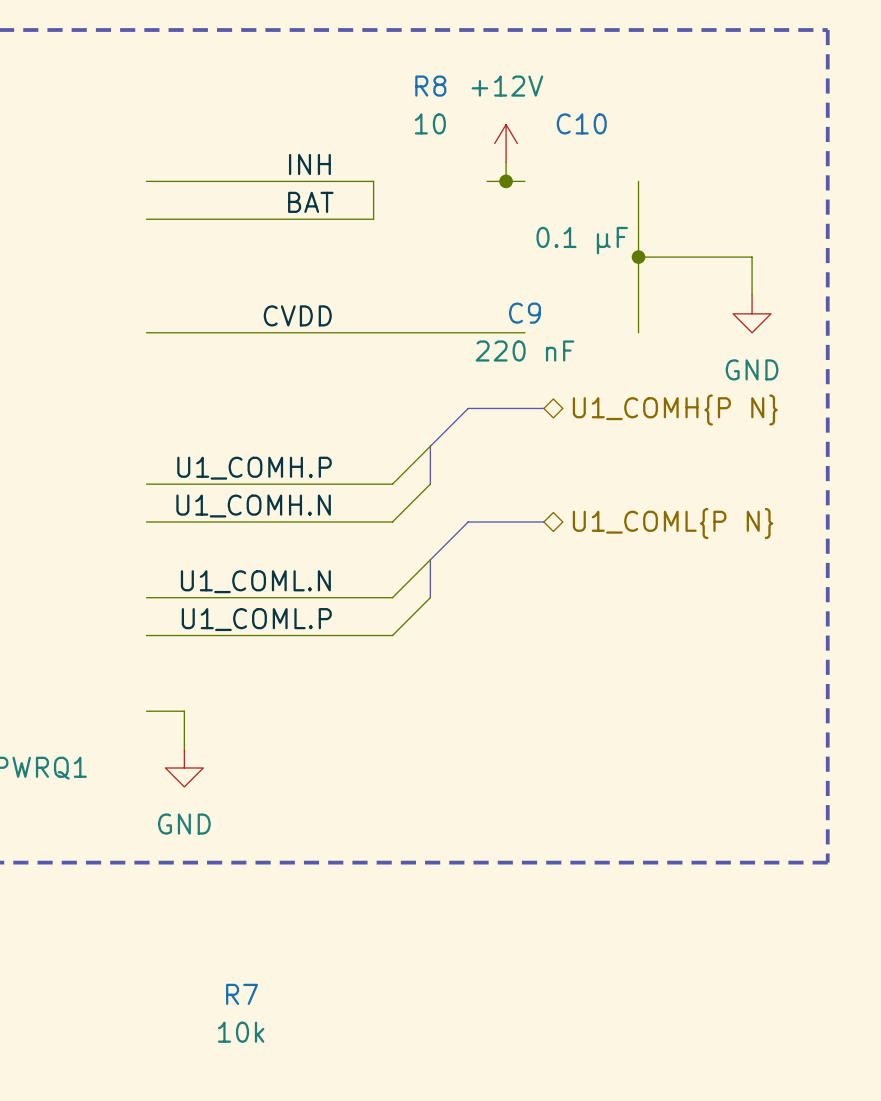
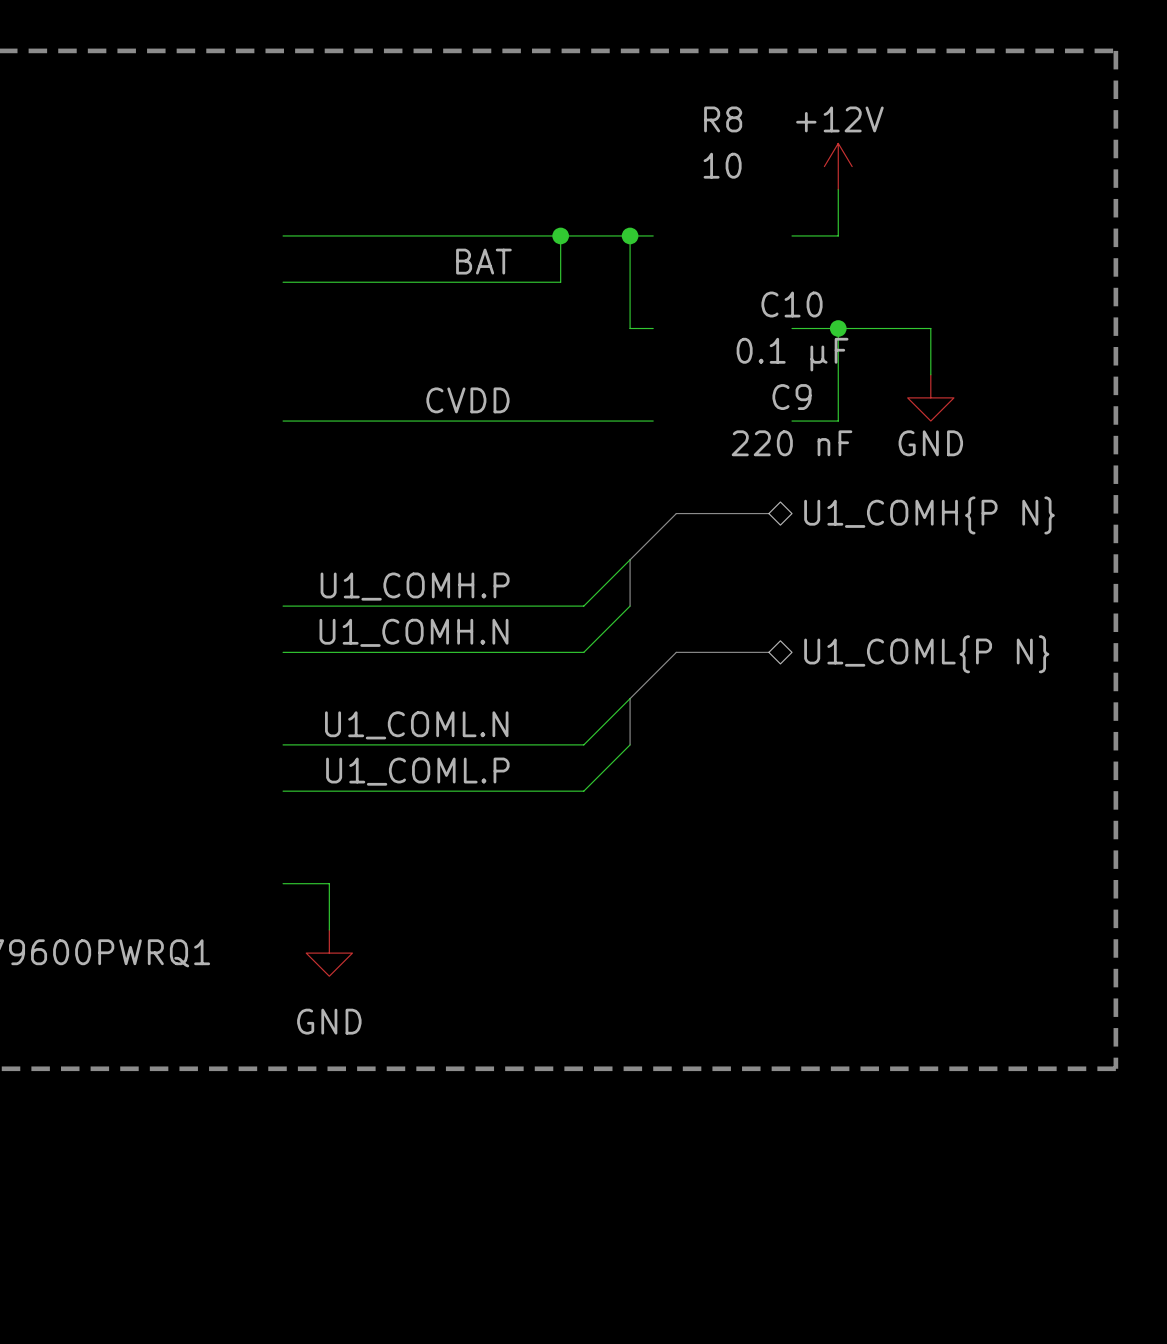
power symbol text position: +12V (507, 86) -> +12V (839, 119)
R8 position: (430, 104) -> (722, 142)
C10 name position: C10 (581, 123) -> C10 (792, 304)
power symbol position: +12V (506, 143) -> +12V (838, 166)
wire: none -> (838, 189) (838, 235) (792, 235)
wire: (506, 162) (506, 181) -> none
label: INH (309, 164) -> none
wire: none -> (560, 235) (653, 235)
junction: none -> (560, 235)
wire: none -> (630, 235) (630, 328) (653, 328)
junction: none -> (630, 235)
wire: (487, 181) (524, 181) -> none
junction: (506, 181) -> none
wire: (638, 181) (638, 332) -> none
C10 position: (582, 183) -> (792, 331)
C10 value position: 0.1 µF (582, 240) -> 0.1 µF (792, 354)
wire: none -> (838, 328) (838, 421) (792, 421)
junction position: (638, 257) -> (838, 328)
wire: (676, 257) (752, 257) (752, 294) -> (930, 328) (930, 374)
power symbol position: GND (752, 313) -> GND (930, 397)
wire: (449, 332) (524, 332) -> (792, 328) (884, 328)
C9 position: (524, 332) -> (792, 420)
power symbol text position: GND (752, 369) -> GND (930, 443)
R7: 10k (241, 1013) -> none

